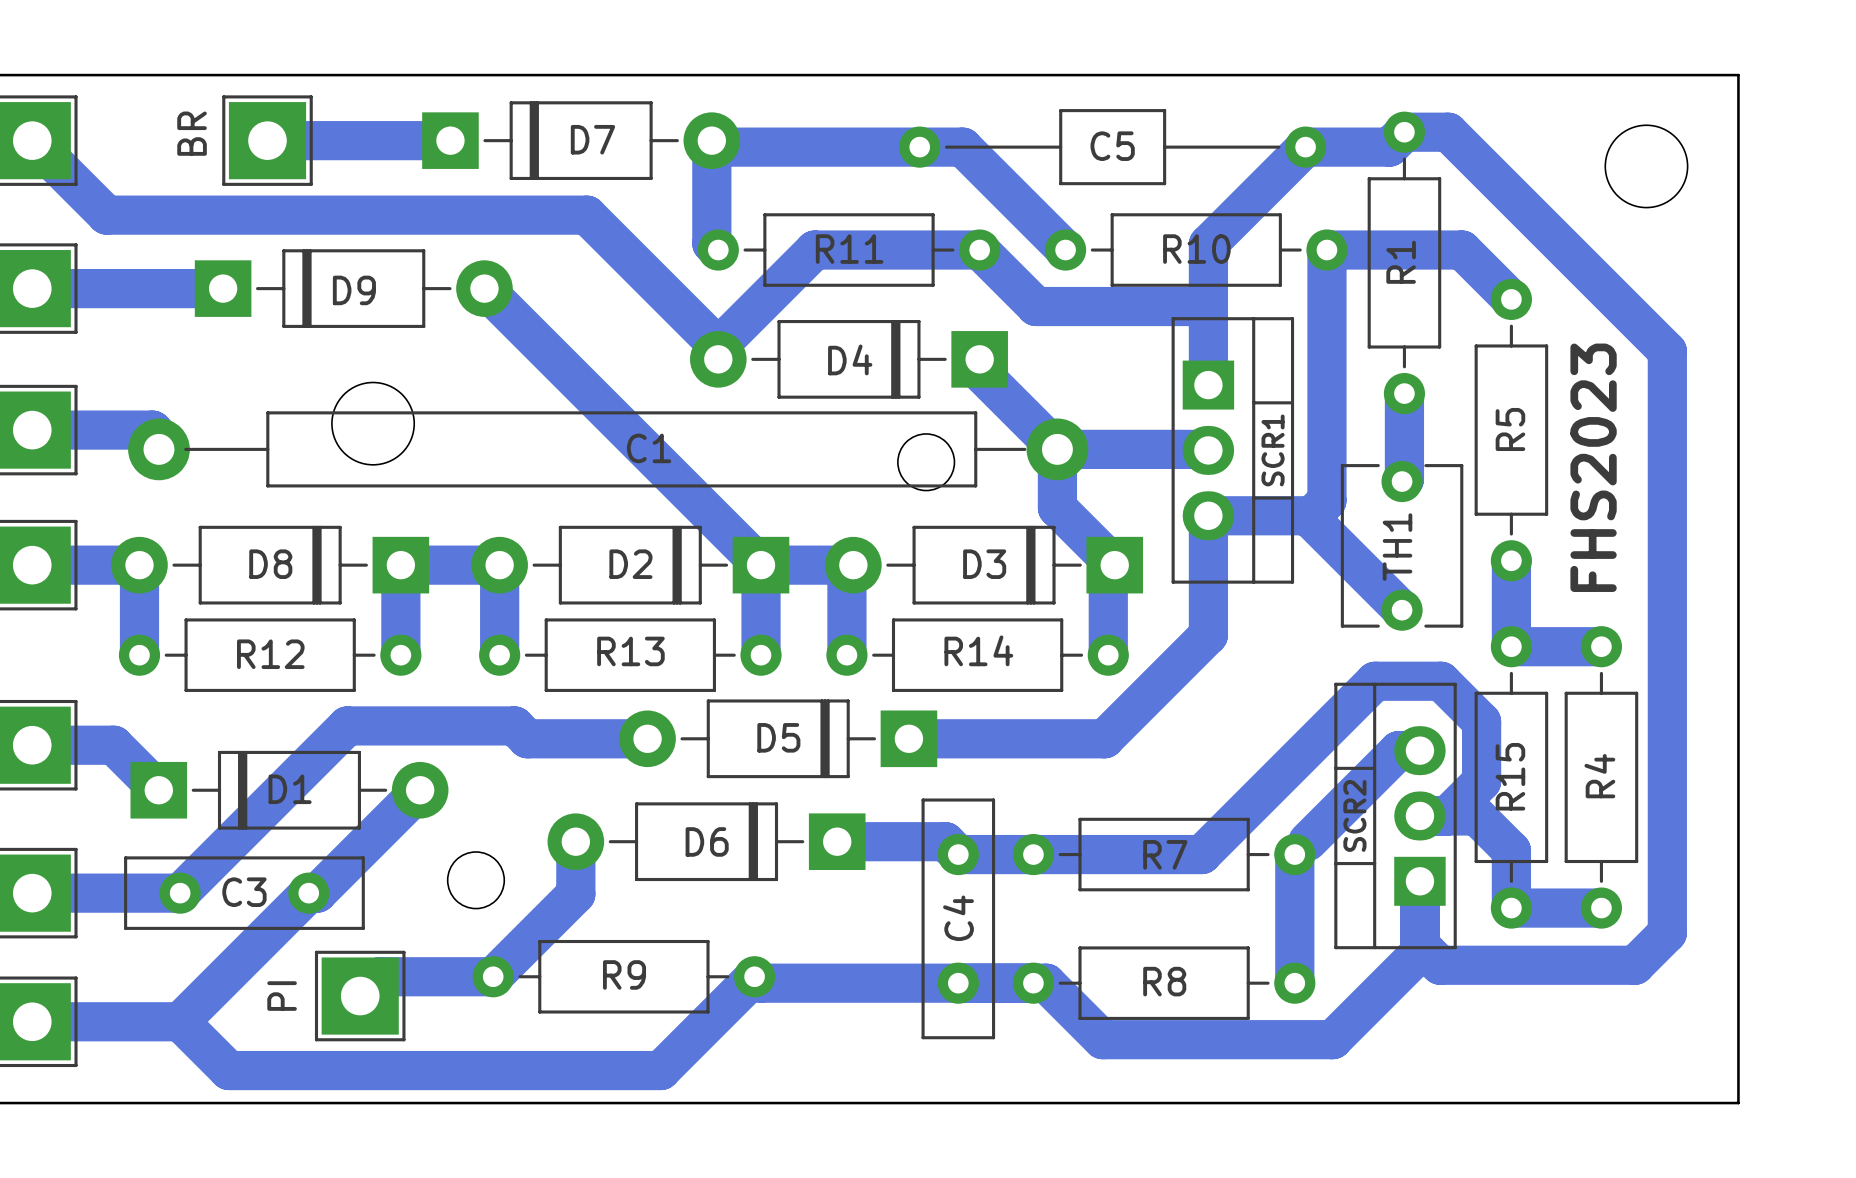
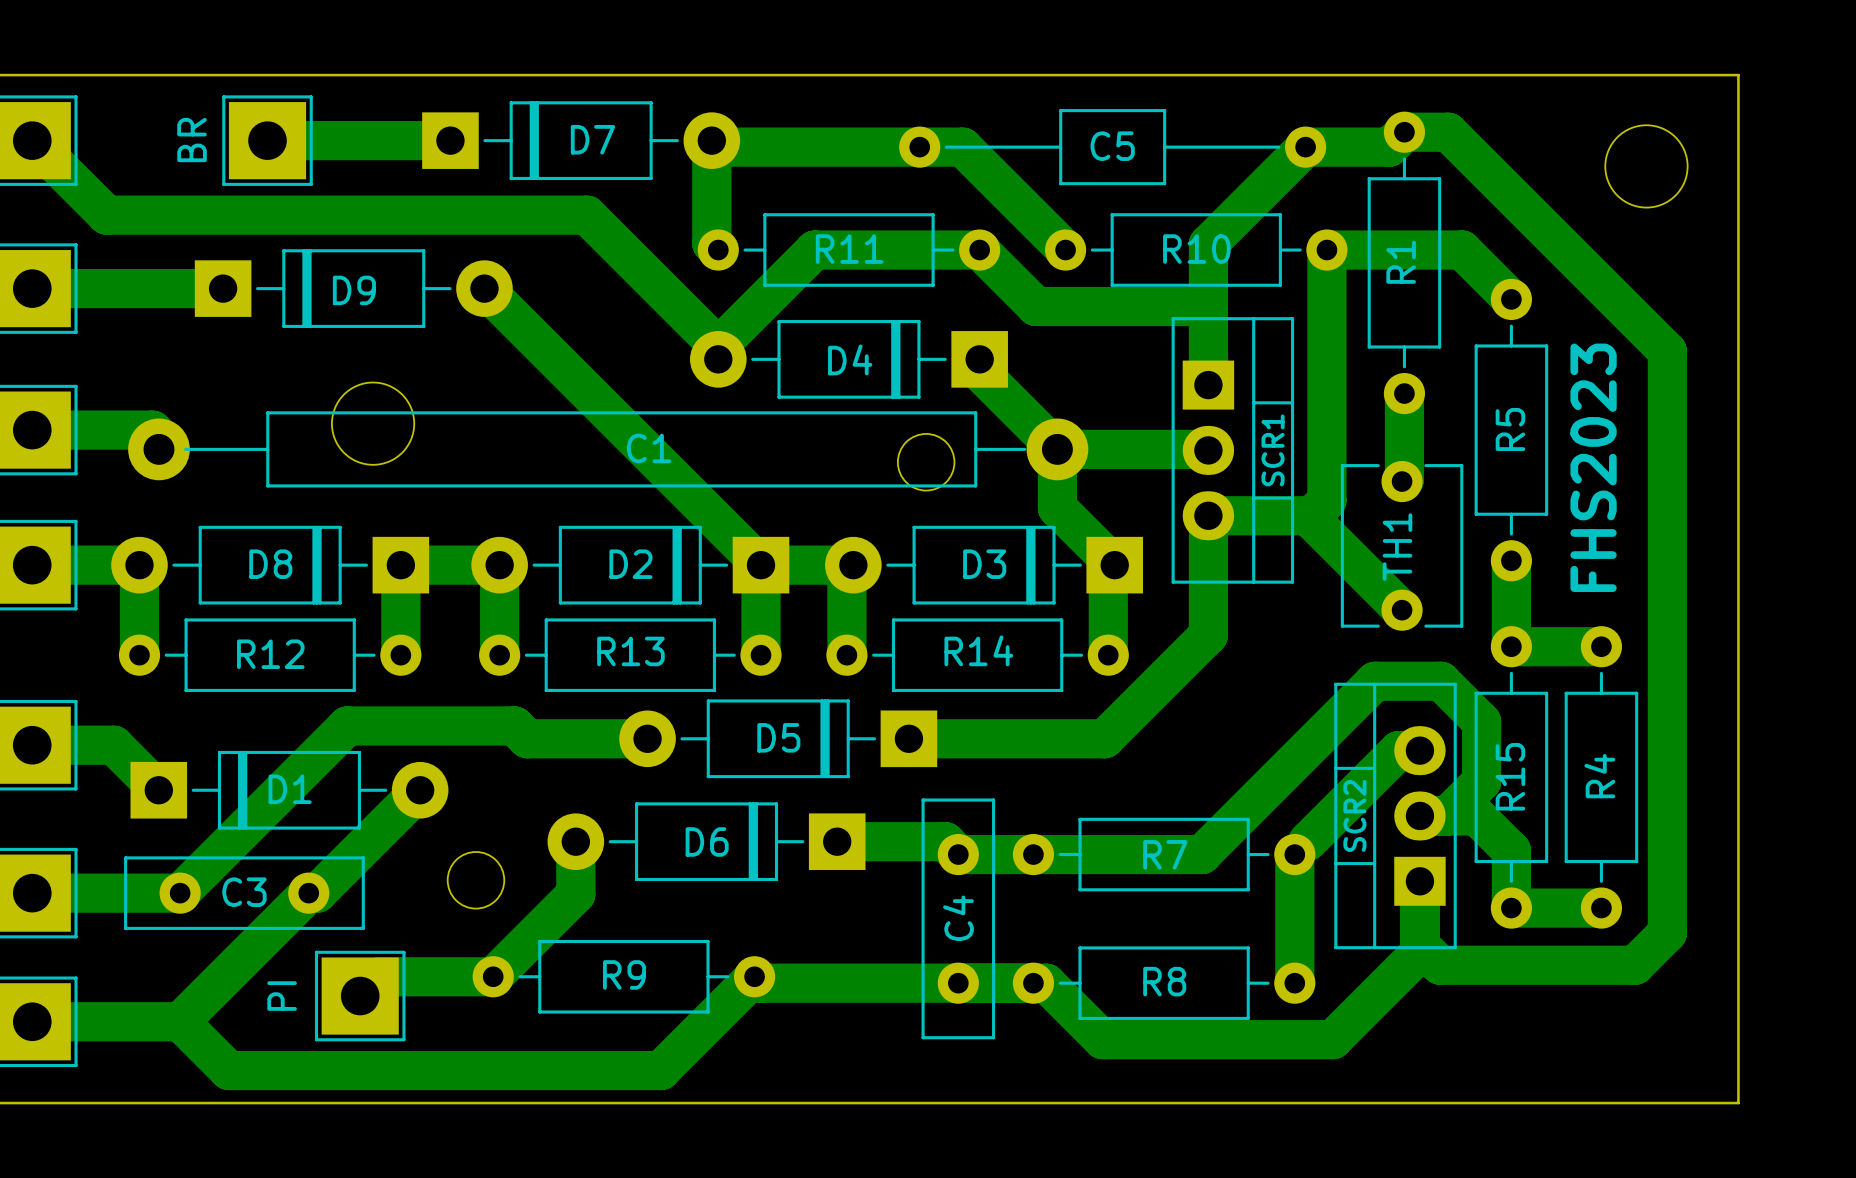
BR name: BR (192, 133) -> none
BR text: none -> BR (192, 140)

